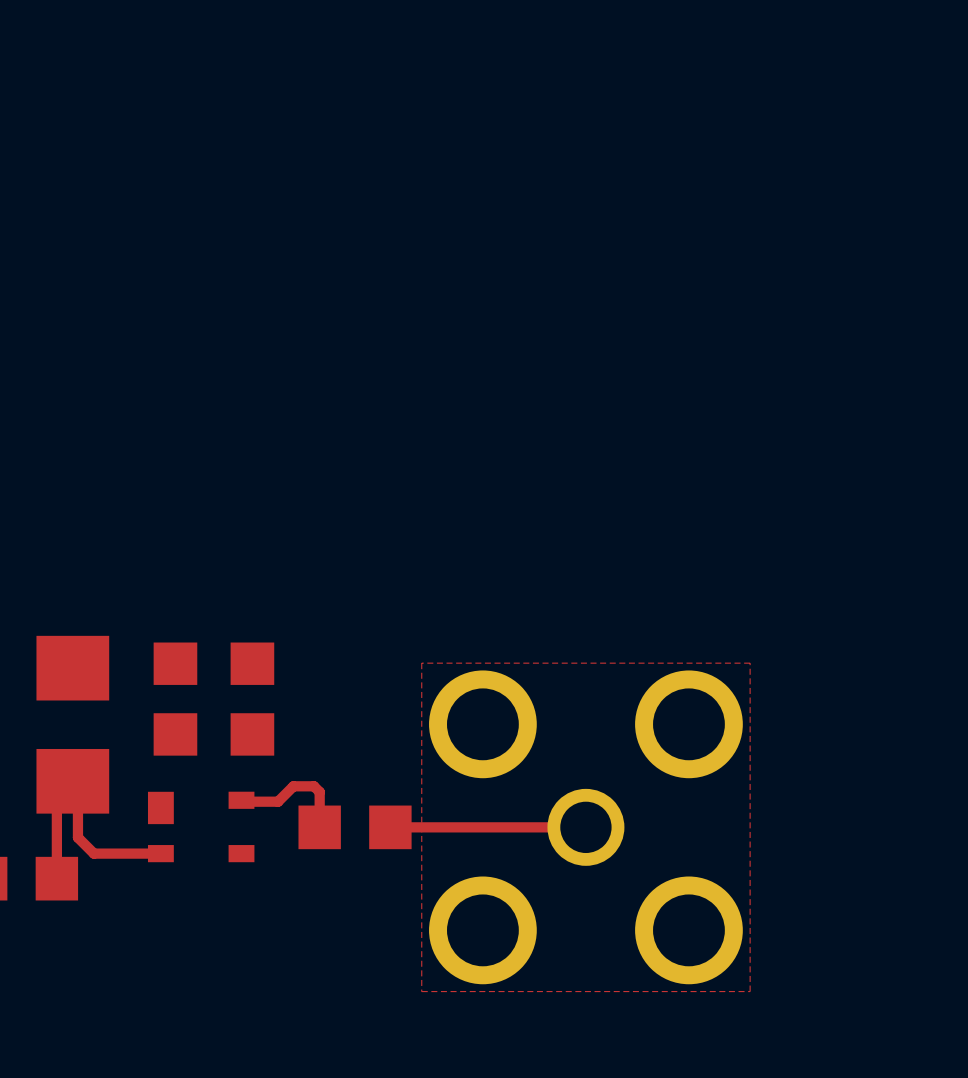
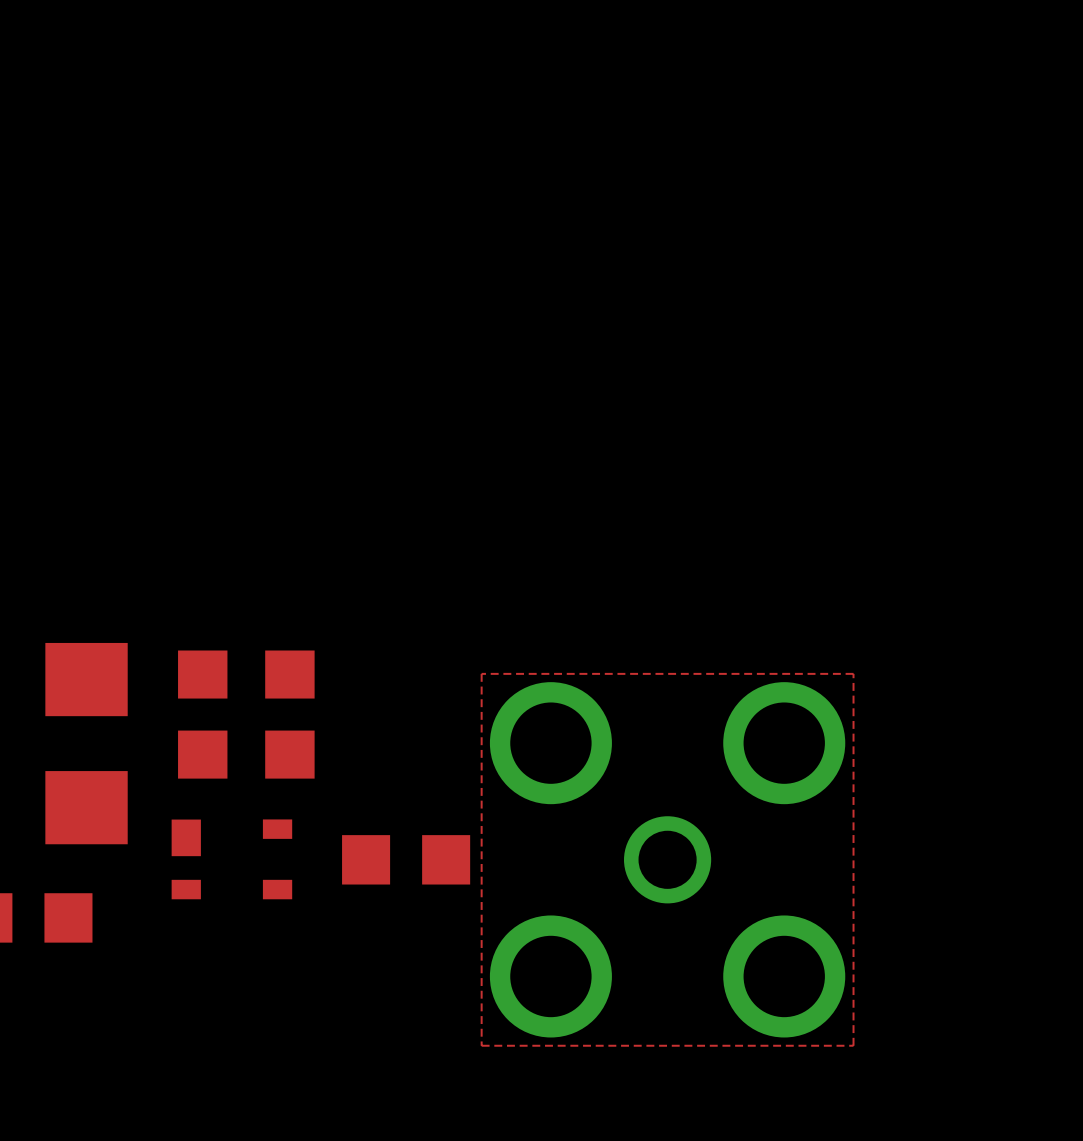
top track: (241, 800) (278, 801) (293, 786) (313, 786) (319, 792) (319, 827) -> none
top track: (585, 827) (390, 827) -> none
top track: (160, 853) (93, 853) (77, 837) (77, 786) (72, 781) (56, 797) (56, 878) -> none

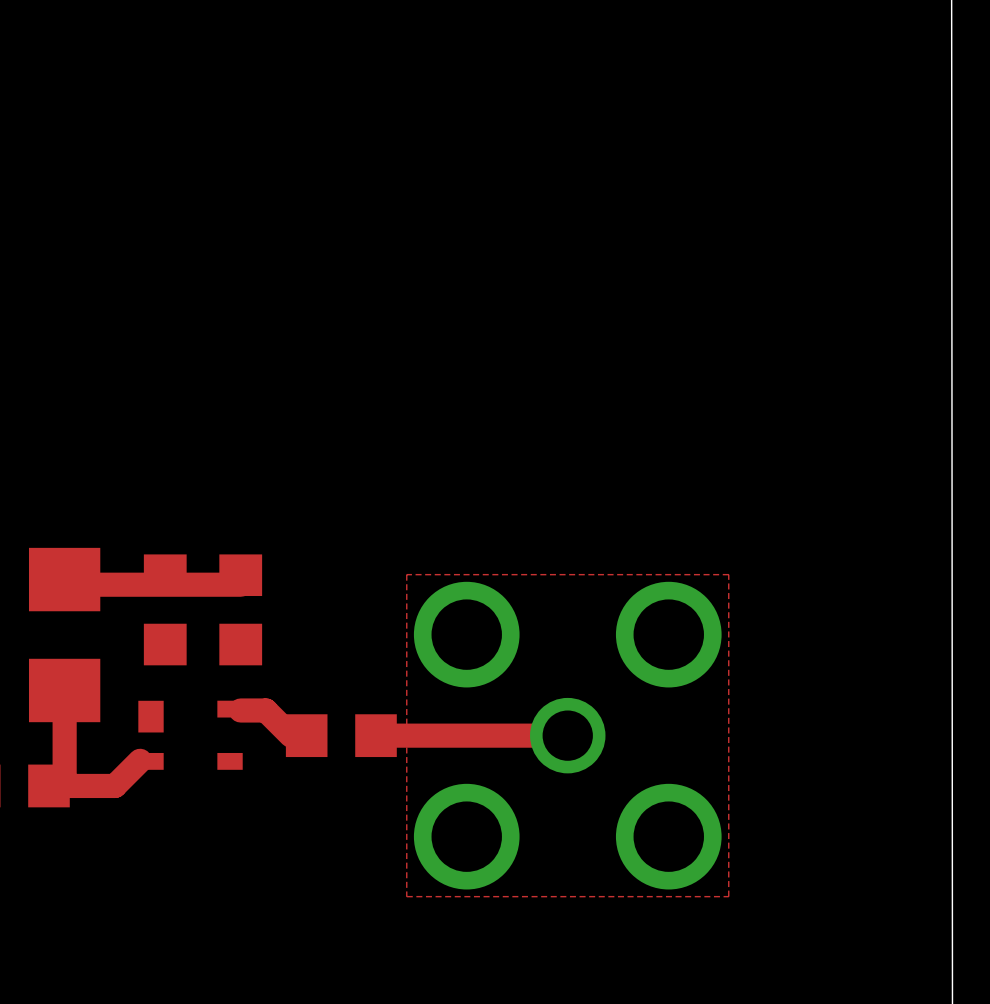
top track: none -> (240, 584) (89, 584)
top track: none -> (64, 710) (64, 785) (114, 785) (140, 760)
top track: none -> (240, 710) (265, 710) (291, 735)
top track: none -> (567, 735) (391, 735)

